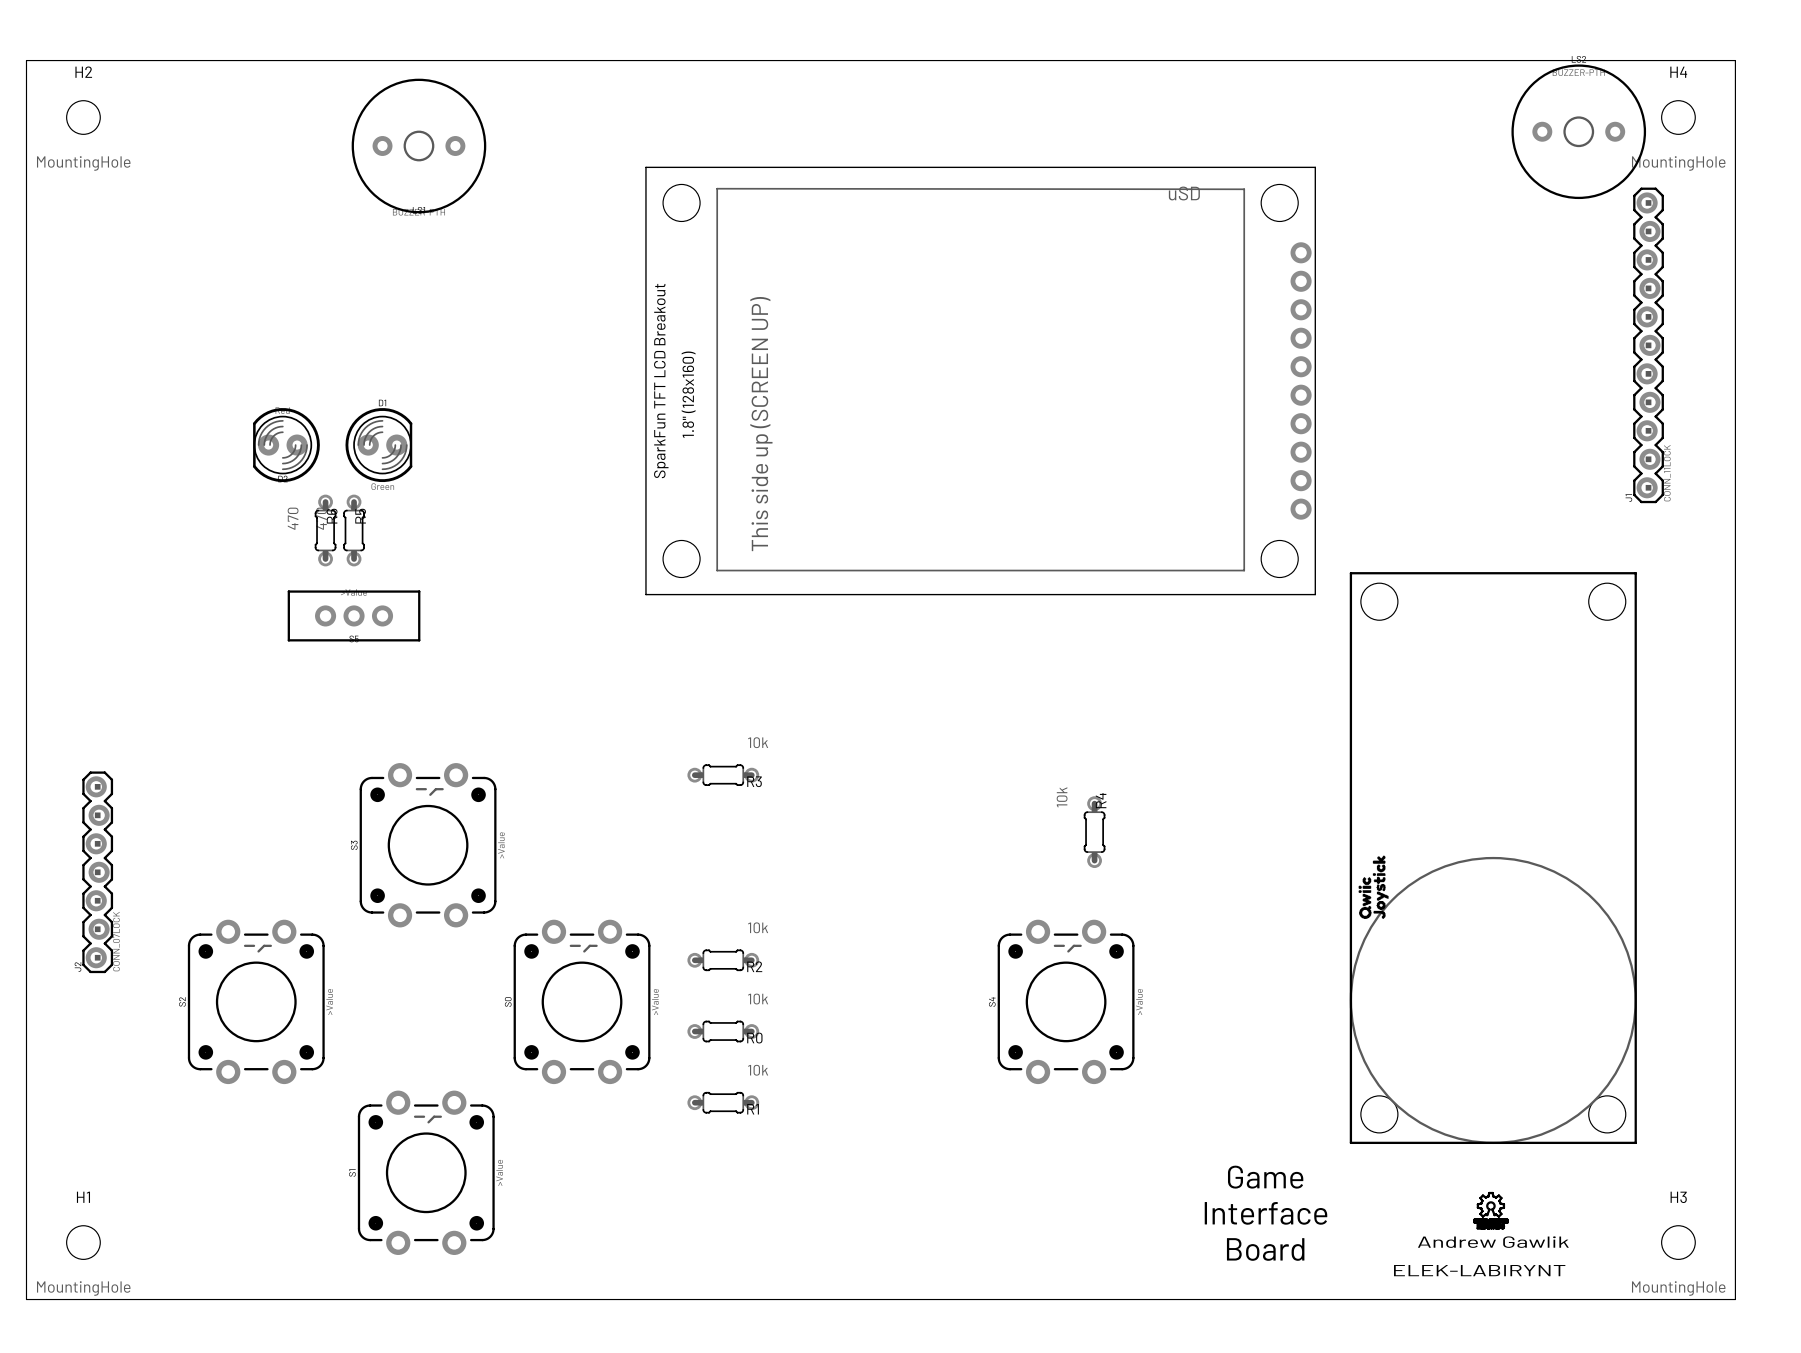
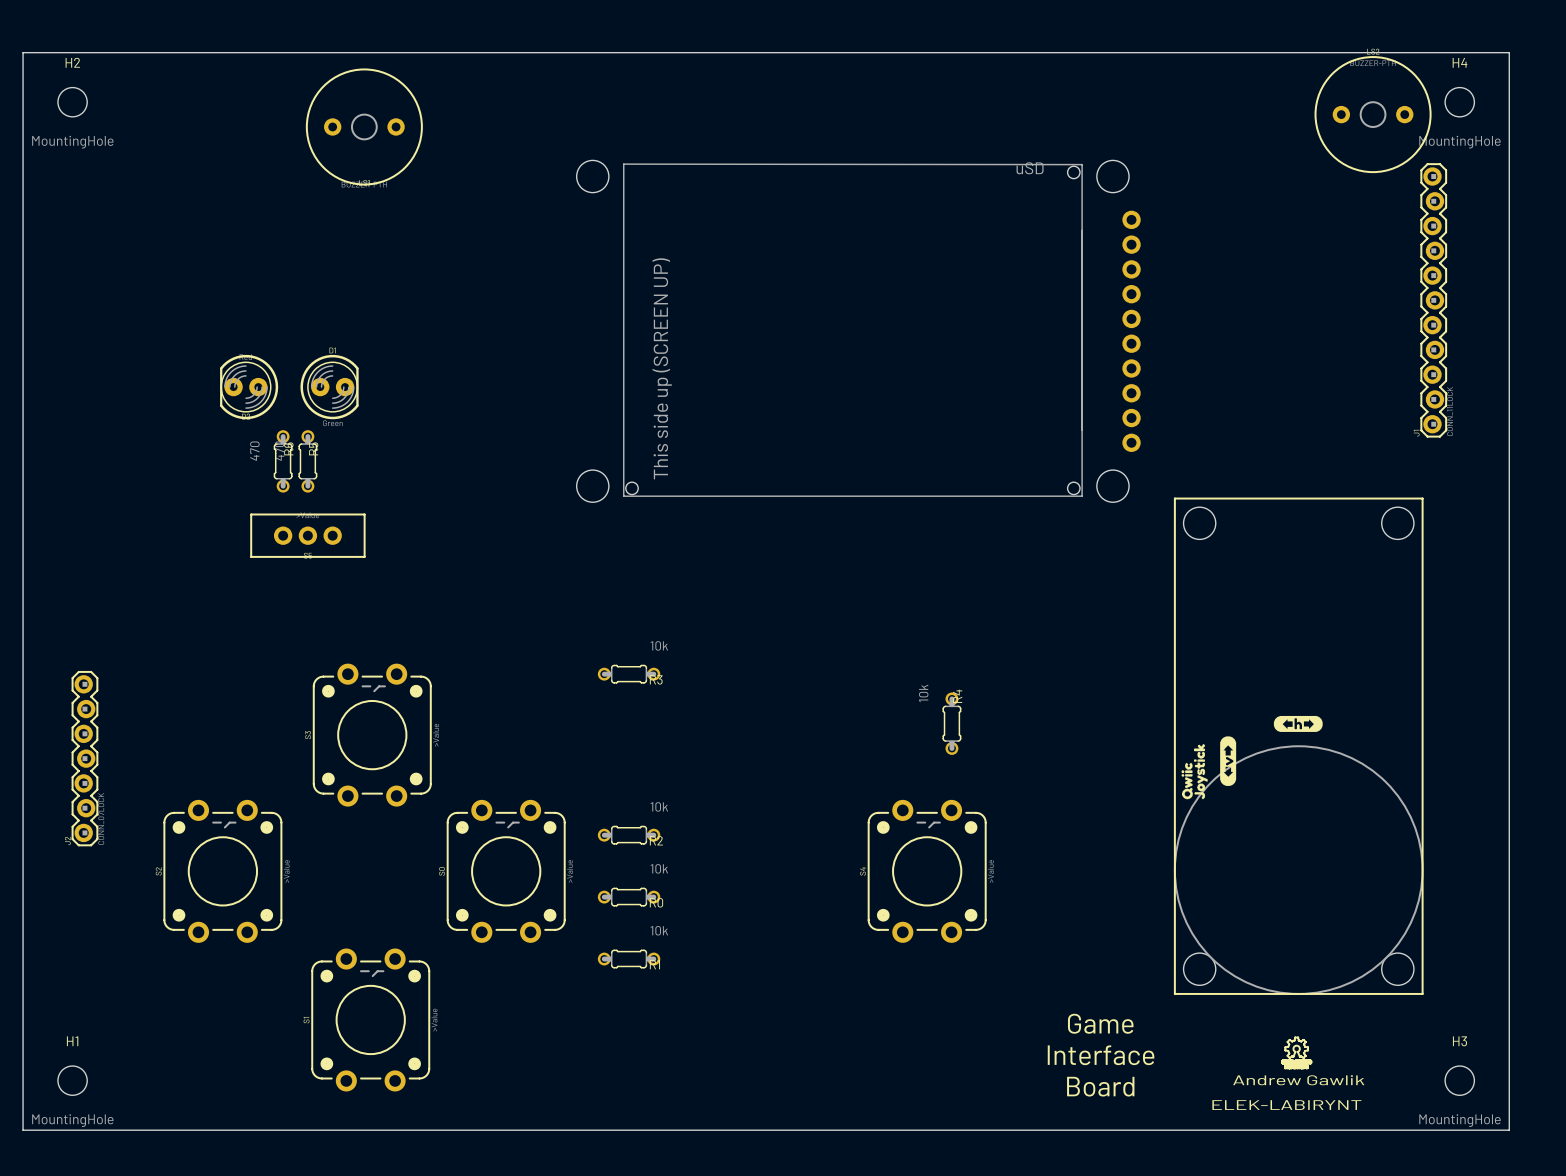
part footprint: [645, 166, 1316, 596] -> [576, 160, 1141, 503]
part footprint: [1349, 572, 1637, 1145] -> [1173, 497, 1424, 995]

